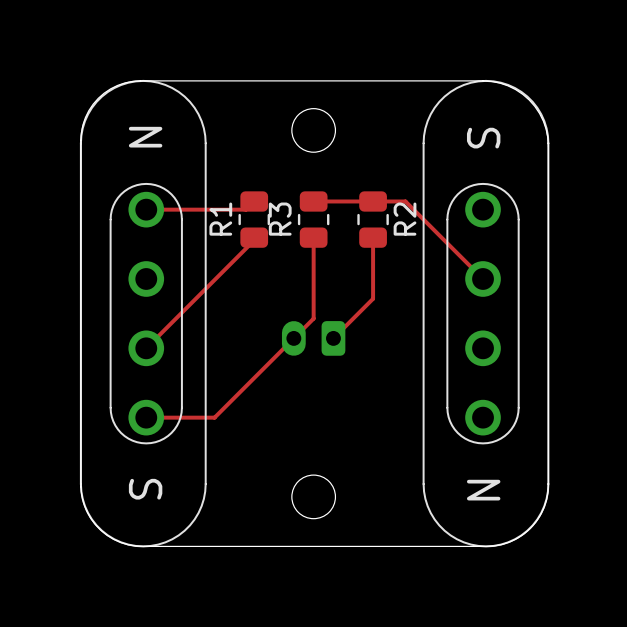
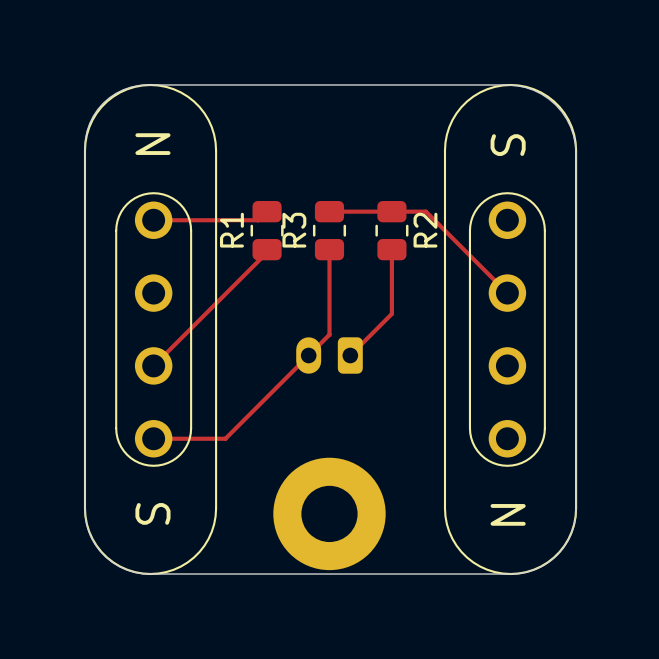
round board edge: [291, 108, 336, 153] -> none
round board edge: [291, 474, 336, 520] -> none
part: none -> (329, 513)

